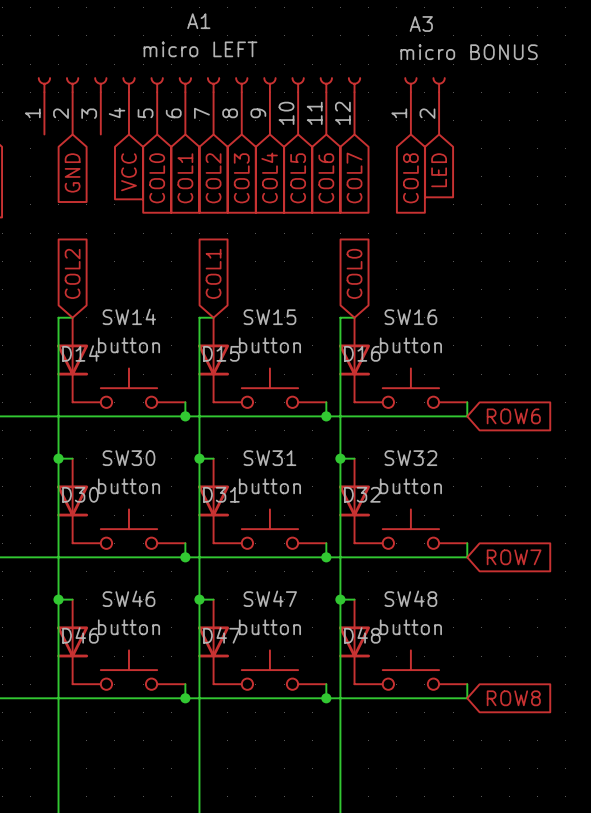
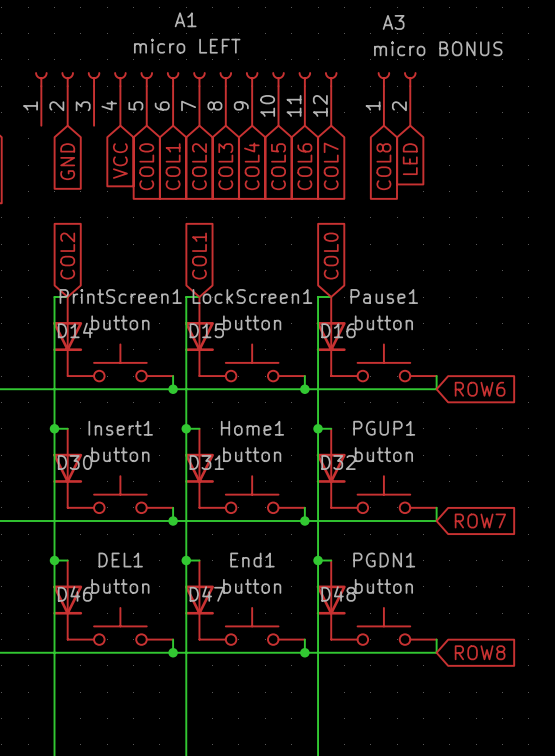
SW14 name: SW14 (129, 316) -> PrintScreen1 (120, 296)
SW15 name: SW15 (269, 317) -> LockScreen1 (252, 296)
SW16 name: SW16 (410, 317) -> Pause1 (384, 296)
SW30 name: SW30 (128, 458) -> Insert1 (120, 428)
SW31 name: SW31 (269, 458) -> Home1 (252, 428)
SW32 name: SW32 (410, 458) -> PGUP1 (384, 428)
SW46 name: SW46 (128, 598) -> DEL1 (120, 560)
SW47 name: SW47 (270, 598) -> End1 (252, 560)
SW48 name: SW48 (410, 598) -> PGDN1 (384, 560)

